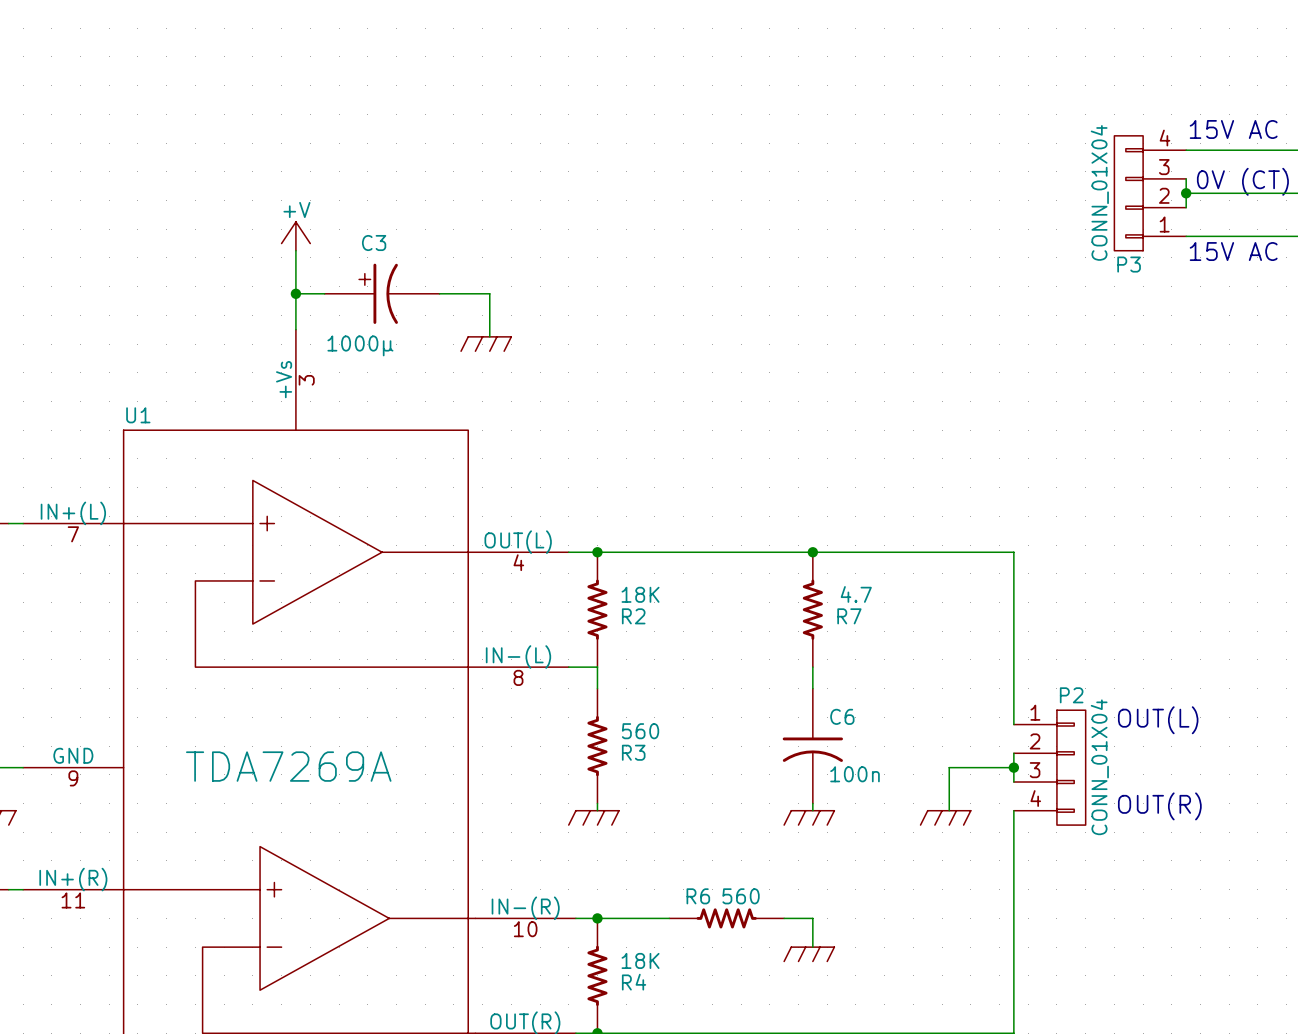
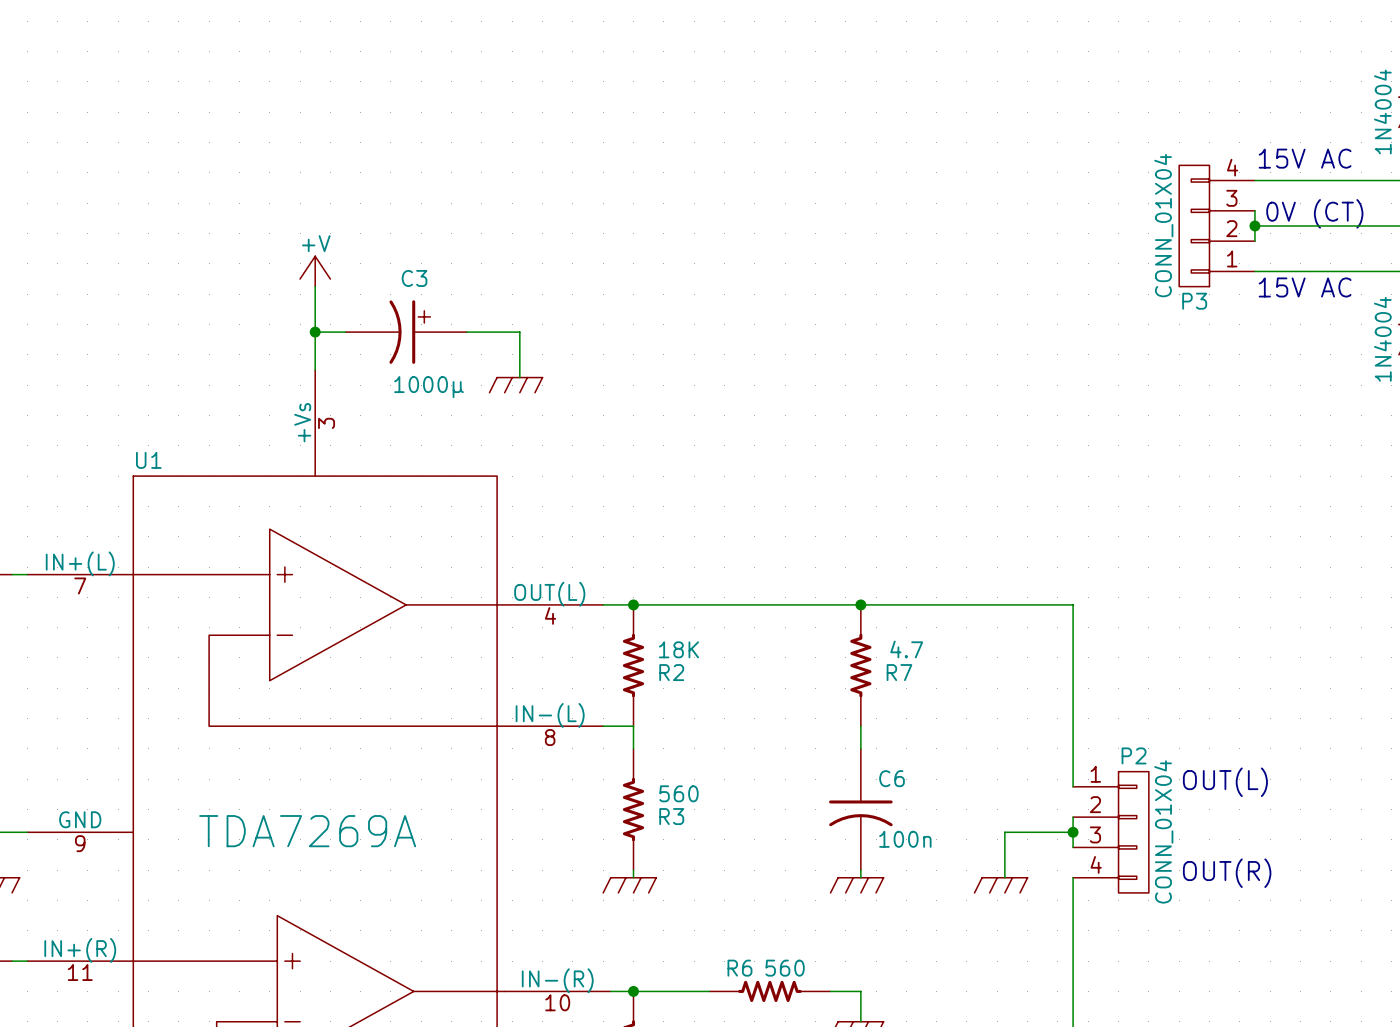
C3 flip: as is (378, 293) -> left-right (410, 332)

